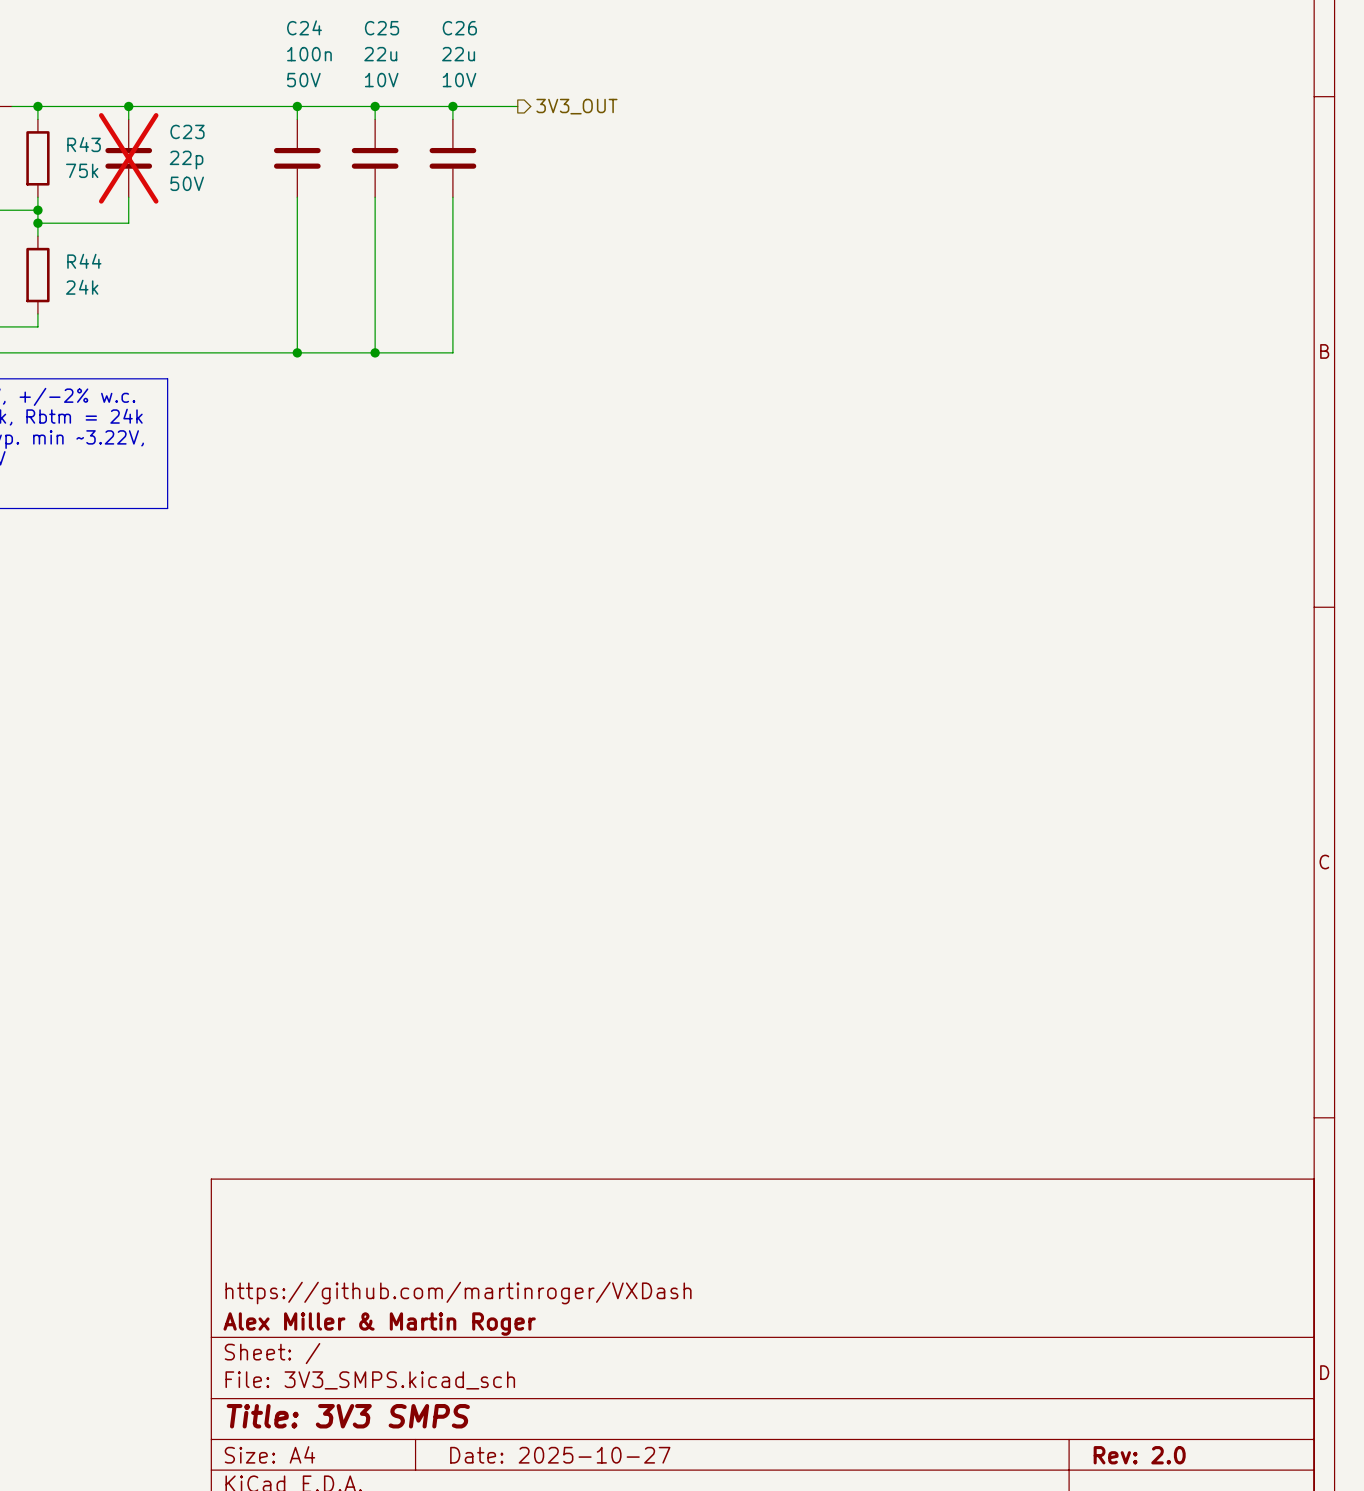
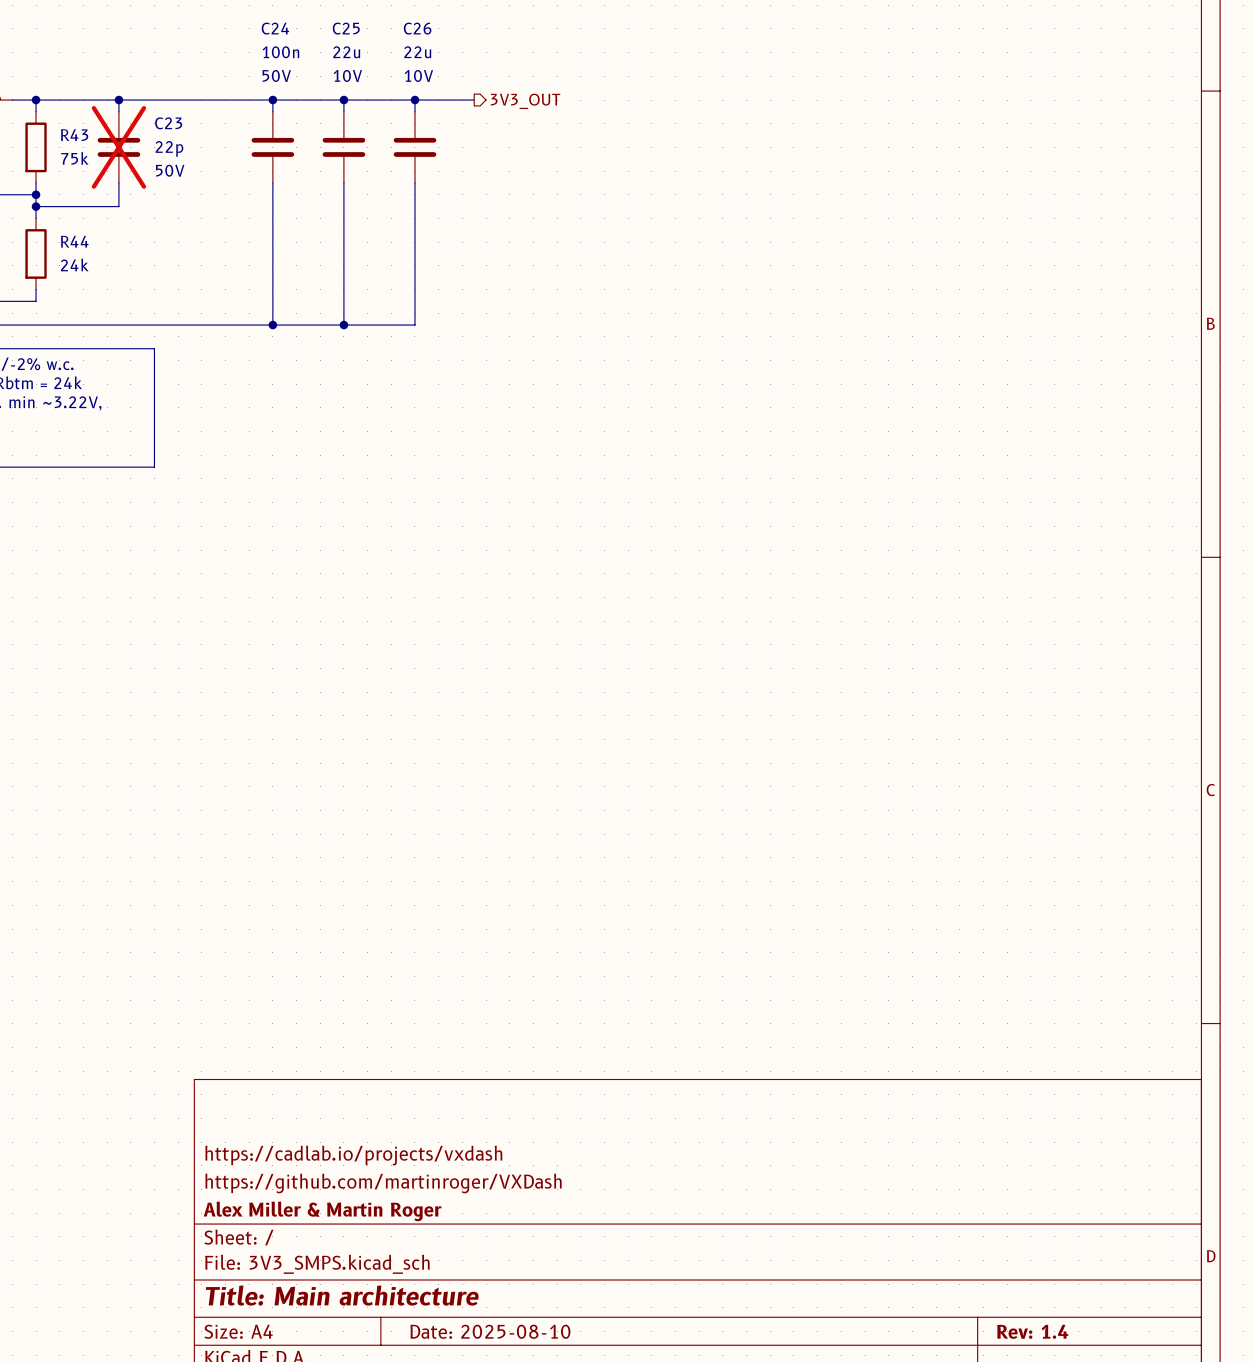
title block: none -> https://cadlab.io/projects/vxdash (353, 1155)
title block: Title: 3V3 SMPS (348, 1416) -> Title: Main architecture (342, 1295)
title block: Date: 2025-10-27 (560, 1455) -> Date: 2025-08-10 (490, 1331)
title block: Rev: 2.0 (1139, 1455) -> Rev: 1.4 (1032, 1331)

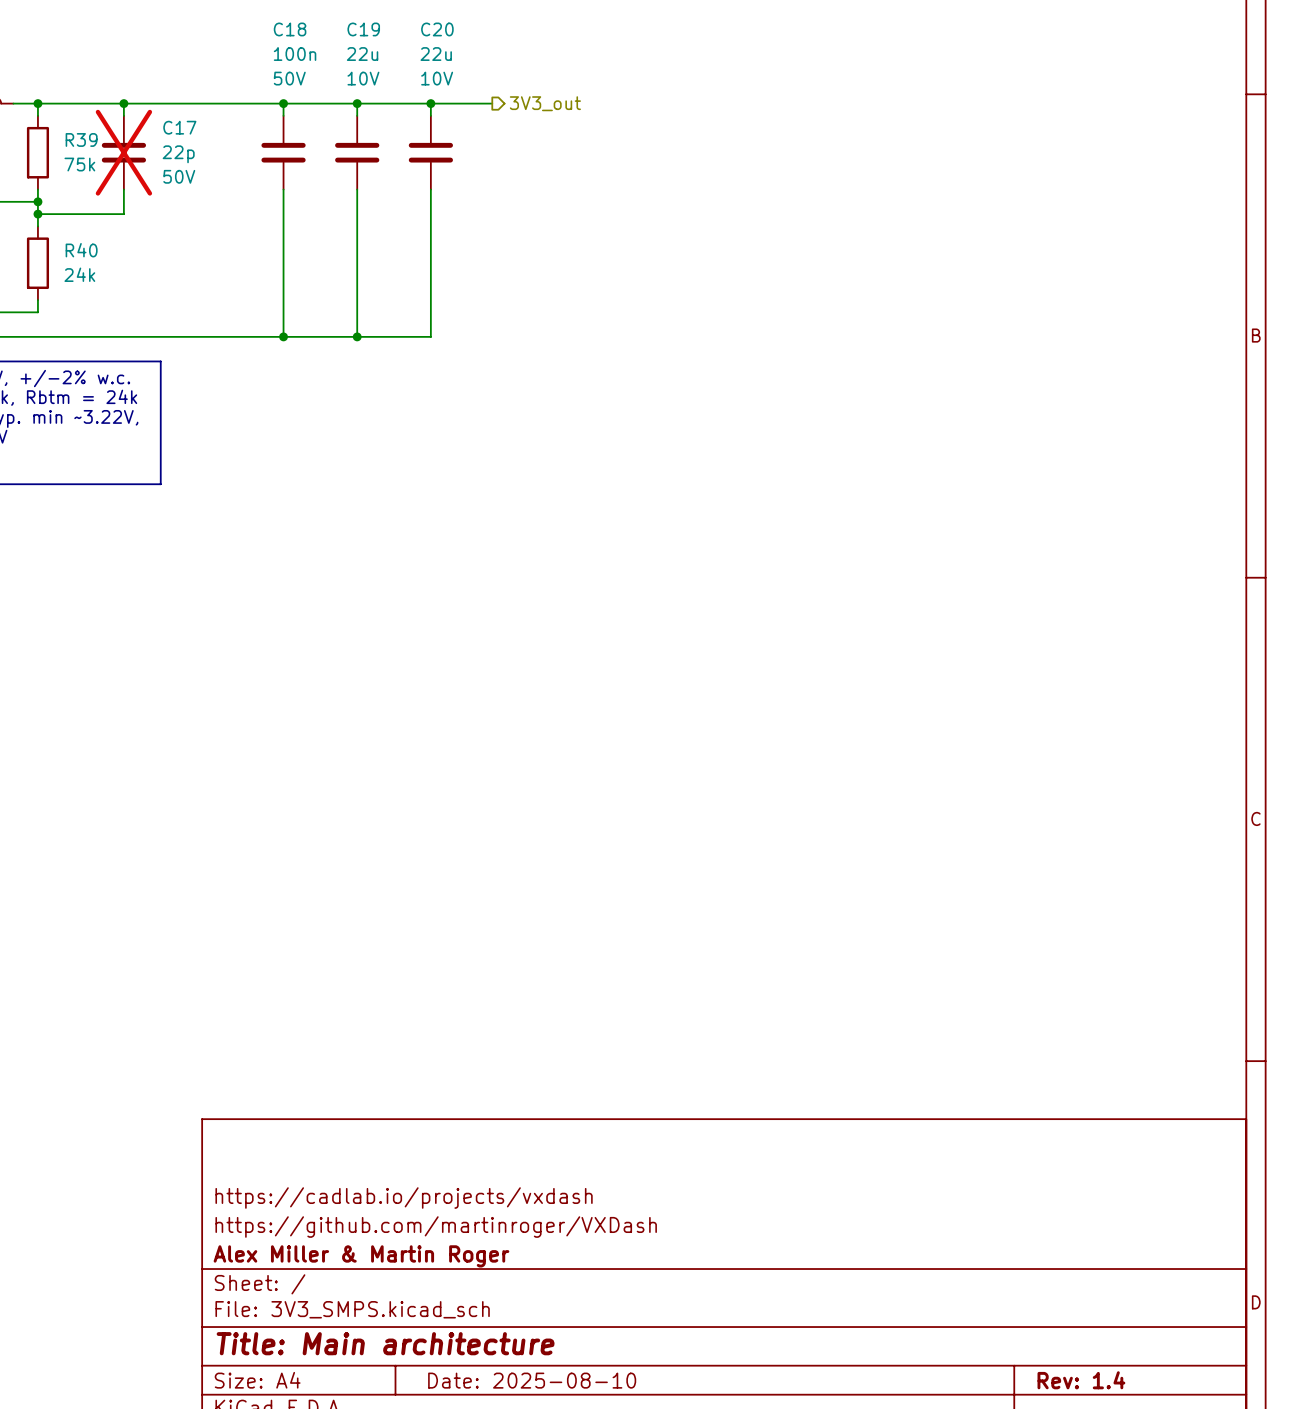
C24 name: C24 (275, 28) -> C18 (290, 29)
C25 name: C25 (346, 28) -> C19 (363, 29)
C26 name: C26 (417, 28) -> C20 (437, 29)
hierarchical label: 3V3_OUT (525, 101) -> 3V3_out (545, 103)
C23 name: C23 (168, 123) -> C17 (179, 127)
R43 name: R43 (74, 135) -> R39 (81, 139)
R44 name: R44 (74, 241) -> R40 (81, 250)

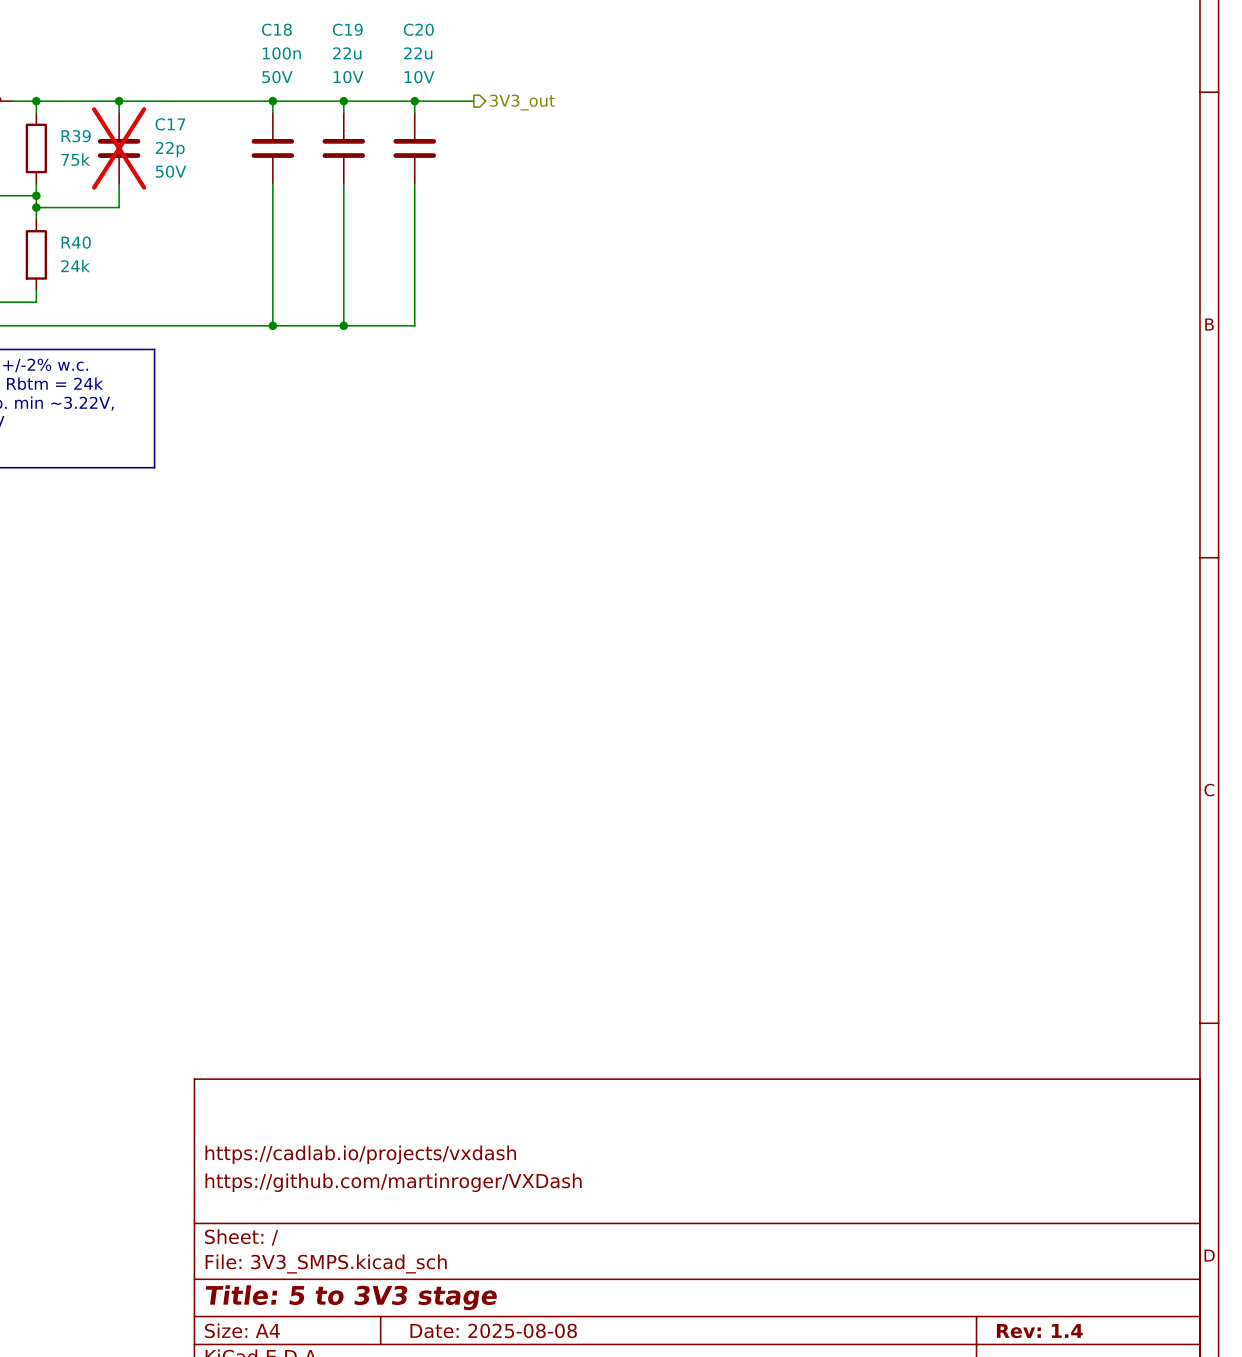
title block: Alex Miller & Martin Roger (361, 1256) -> none
title block: Title: Main architecture (385, 1343) -> Title: 5 to 3V3 stage (351, 1297)
title block: Date: 2025-08-10 (532, 1380) -> Date: 2025-08-08 (493, 1330)

